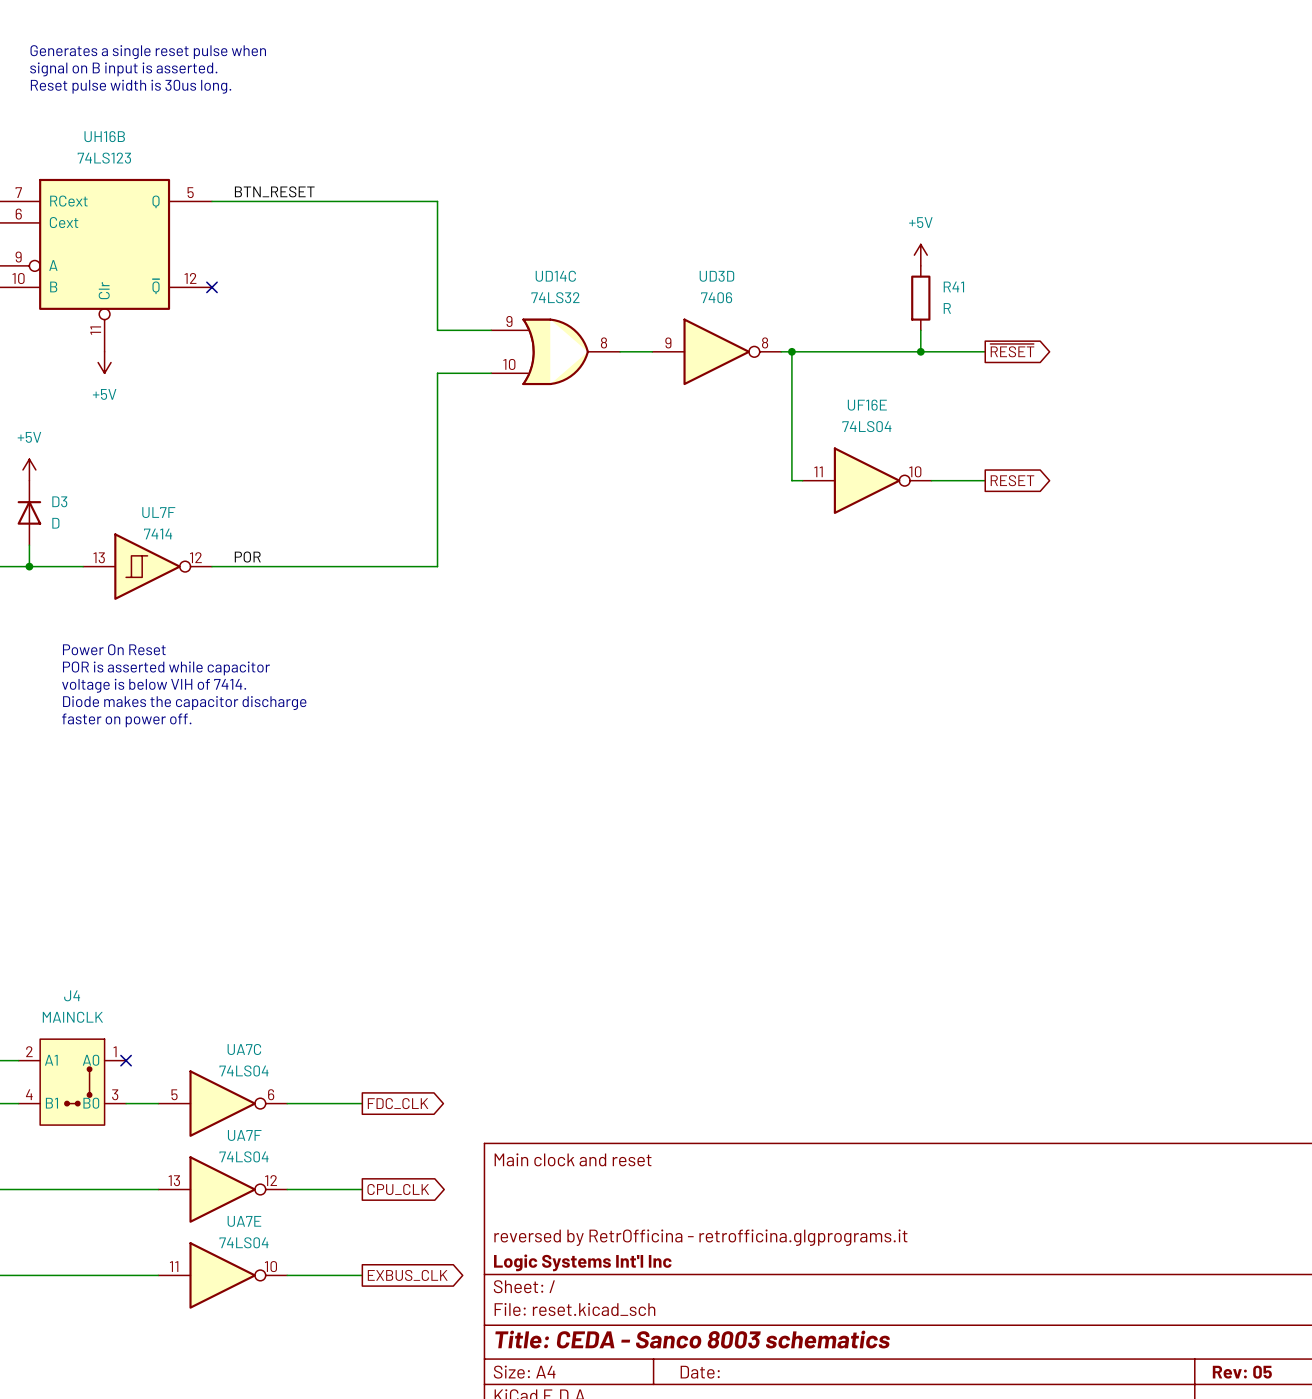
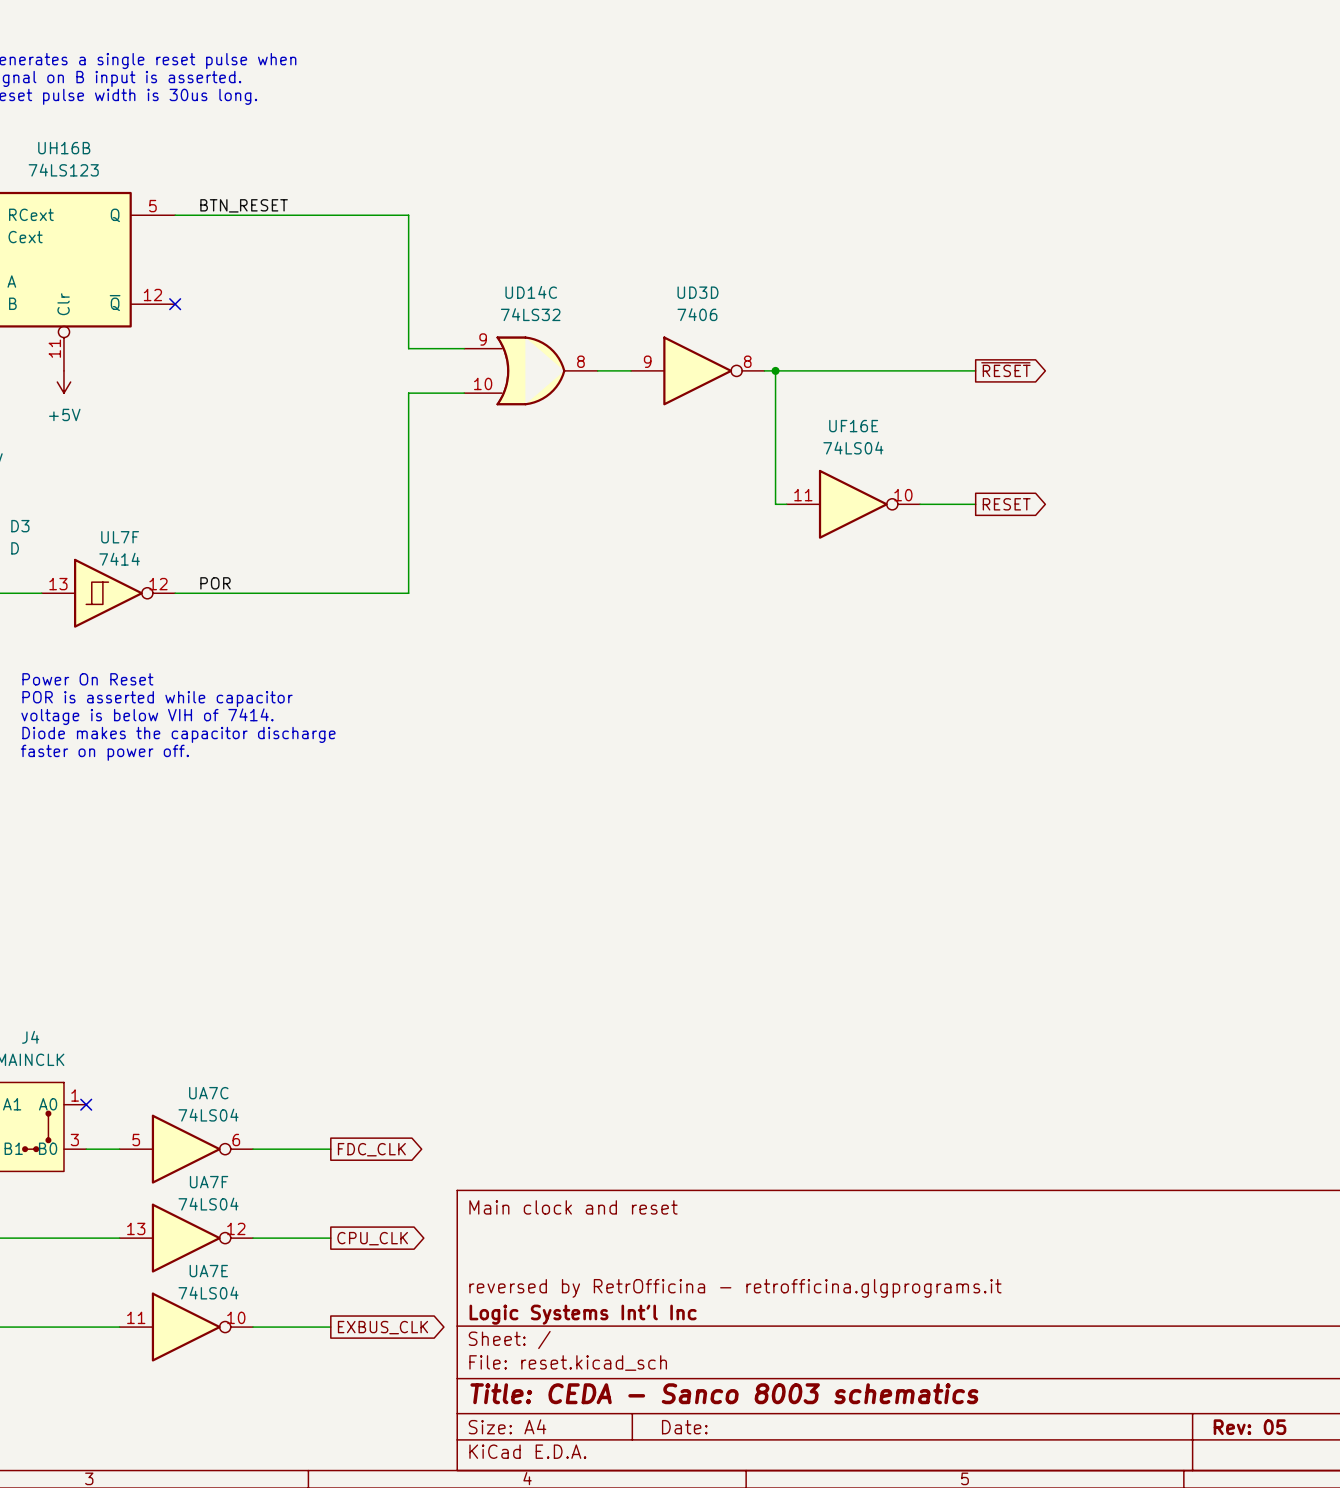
power symbol: +5V (920, 255) -> none
R41: R (920, 298) -> none
wire: (920, 330) (920, 351) -> none
junction: (920, 351) -> none

